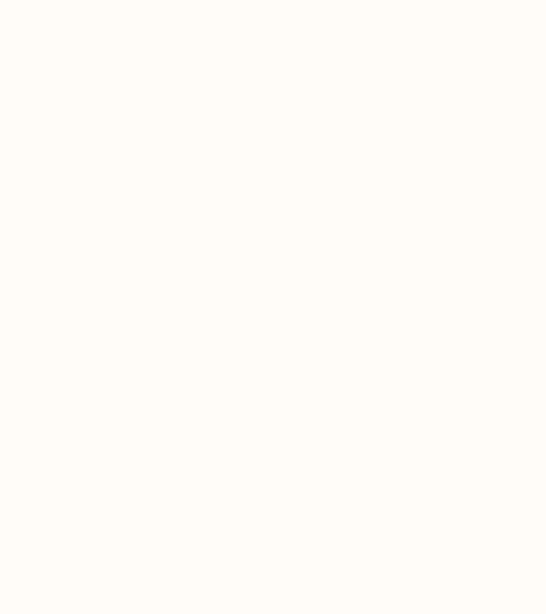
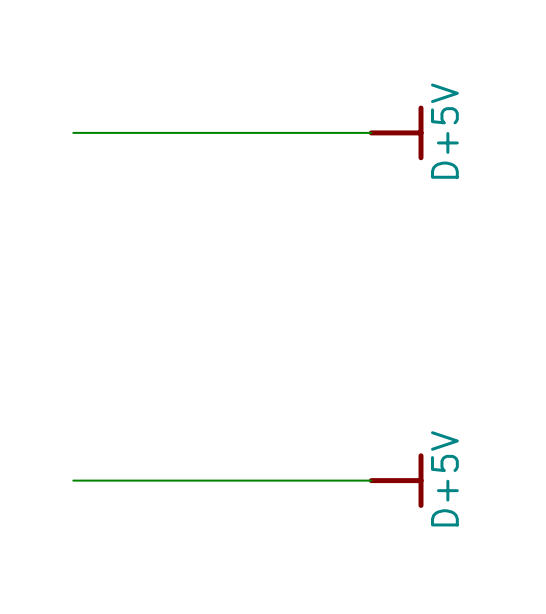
wire: none -> (73, 132) (371, 132)
power symbol: none -> D+5V (396, 132)
wire: none -> (73, 480) (371, 480)
power symbol: none -> D+5V (396, 480)

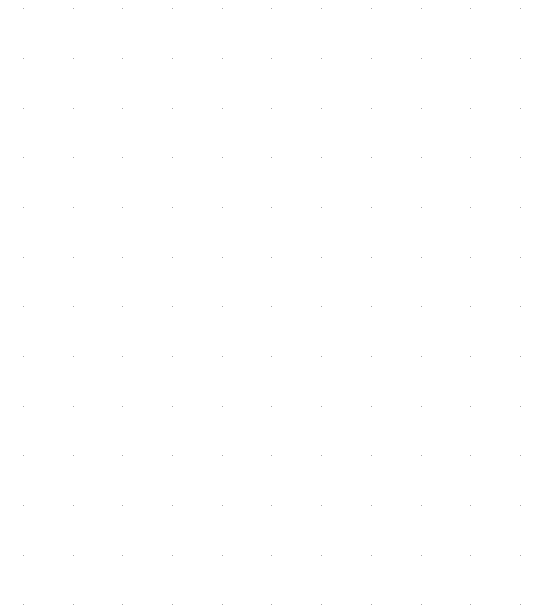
wire: (73, 132) (371, 132) -> none
power symbol: D+5V (396, 132) -> none
wire: (73, 480) (371, 480) -> none
power symbol: D+5V (396, 480) -> none

